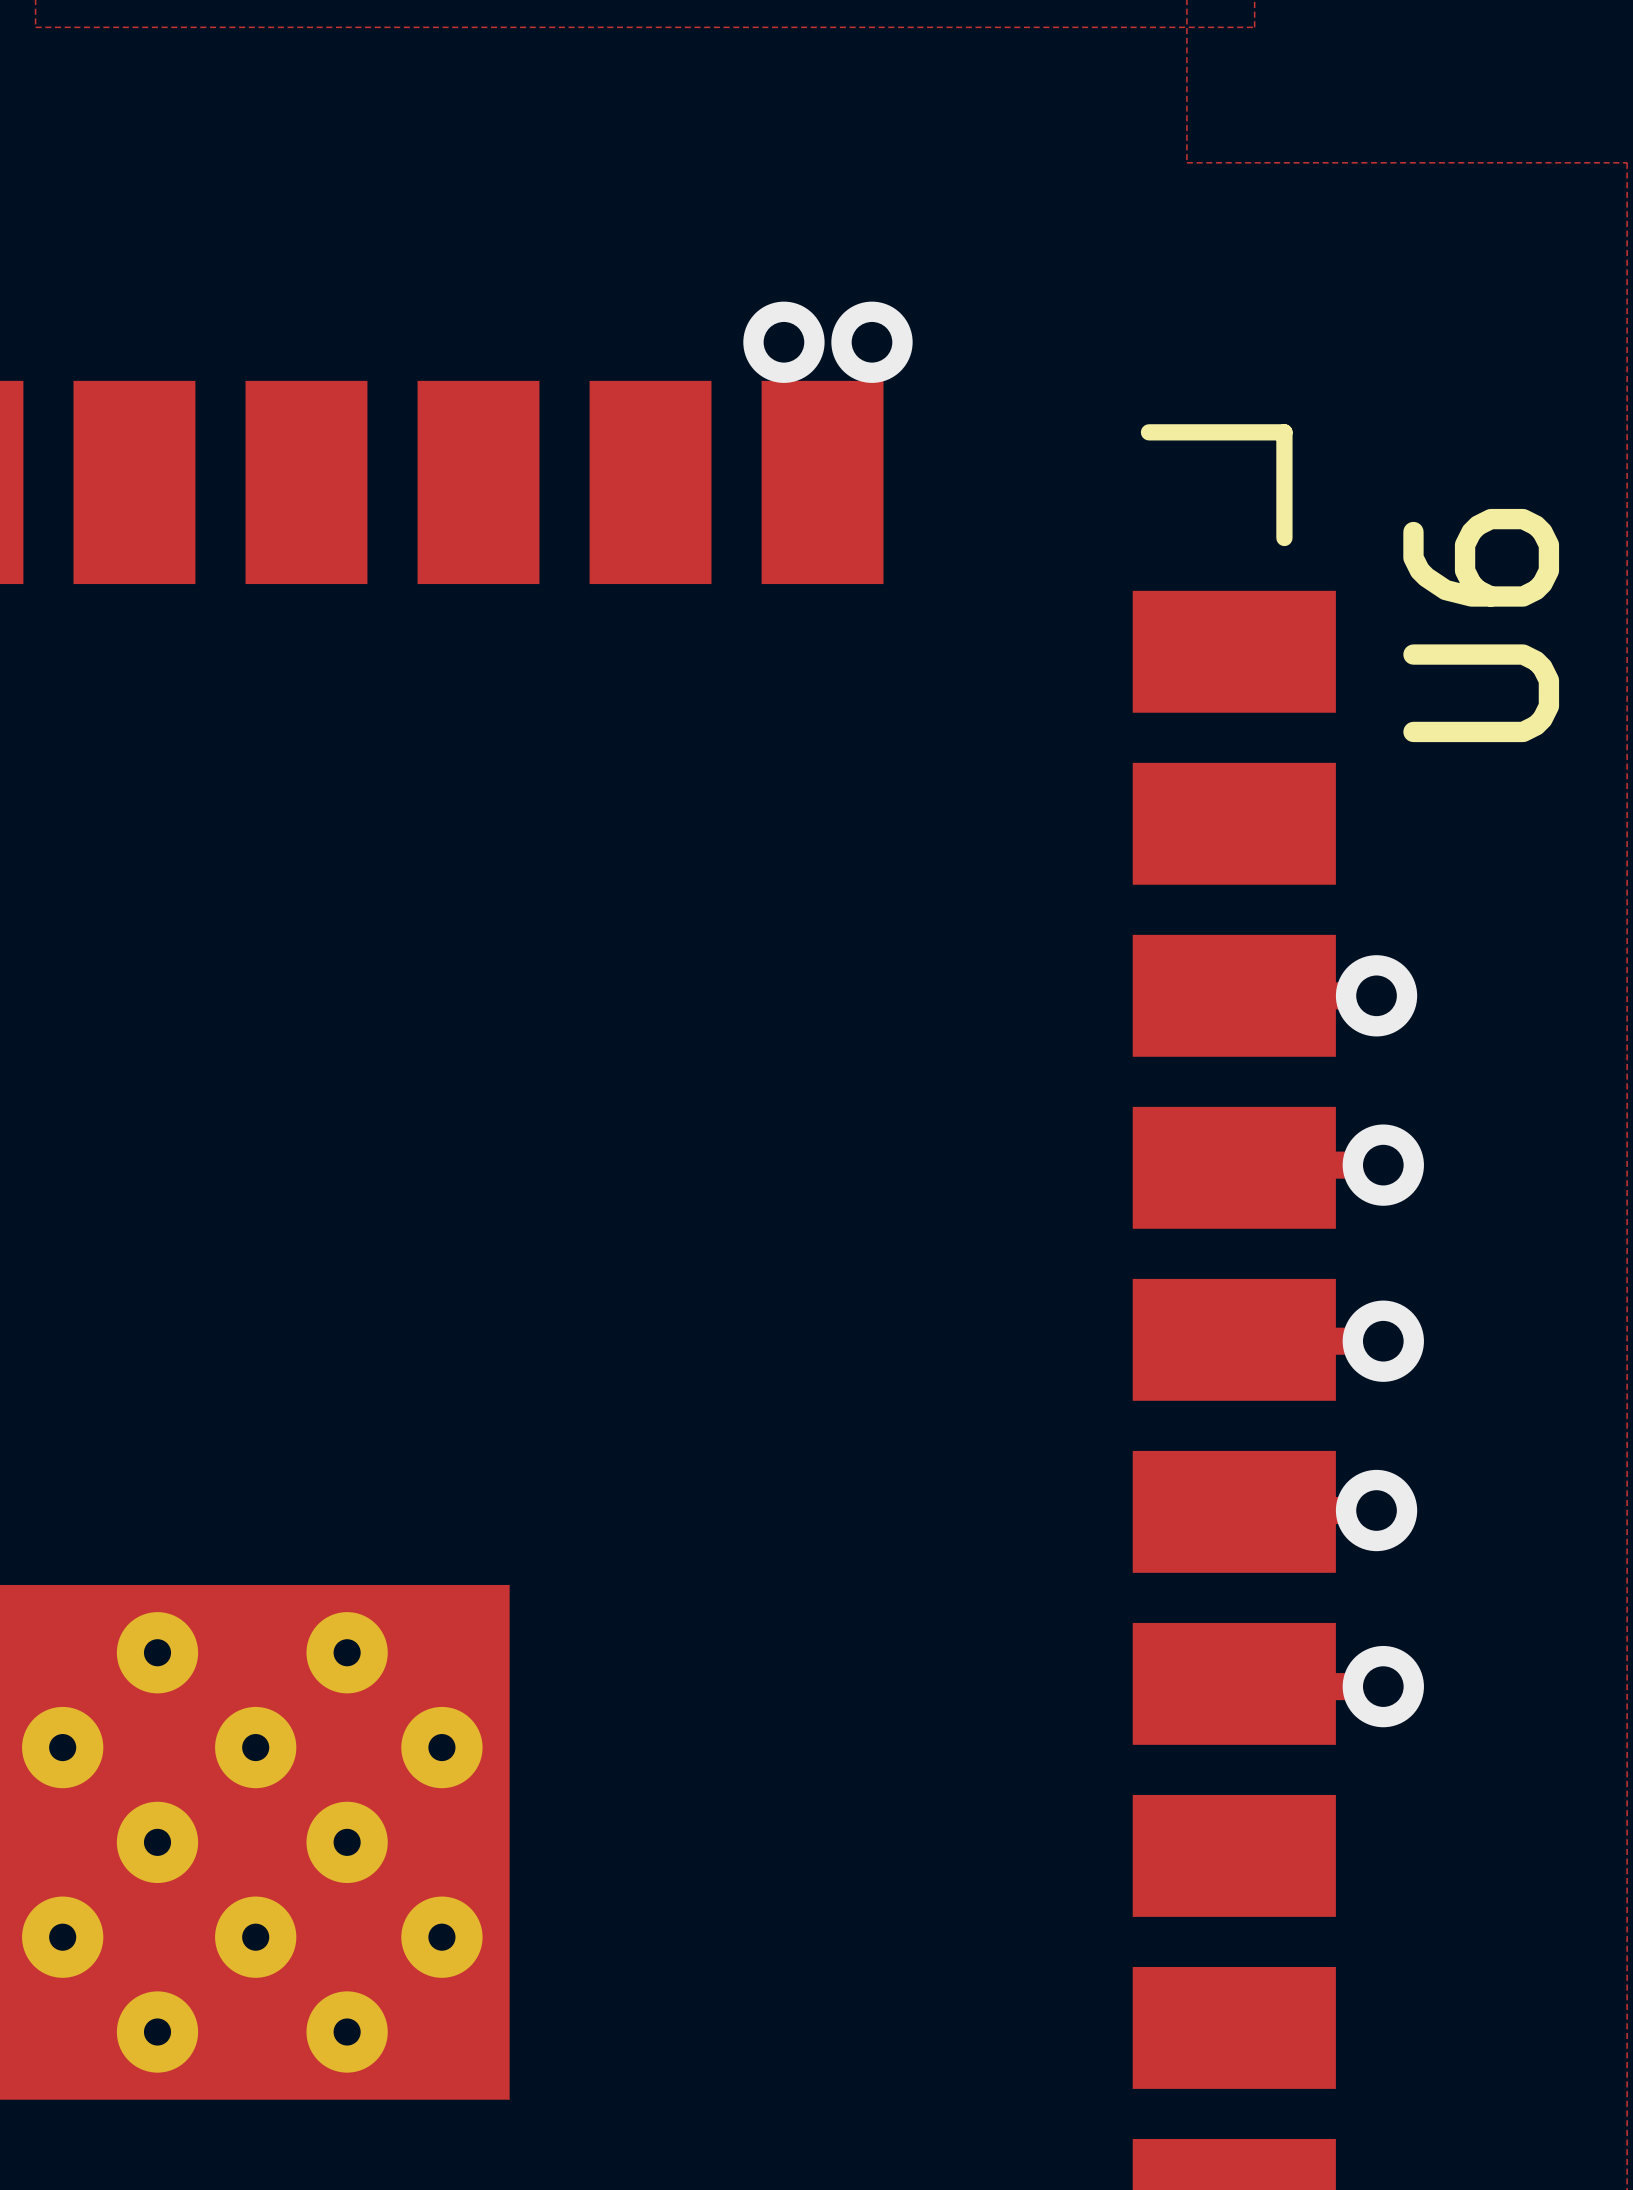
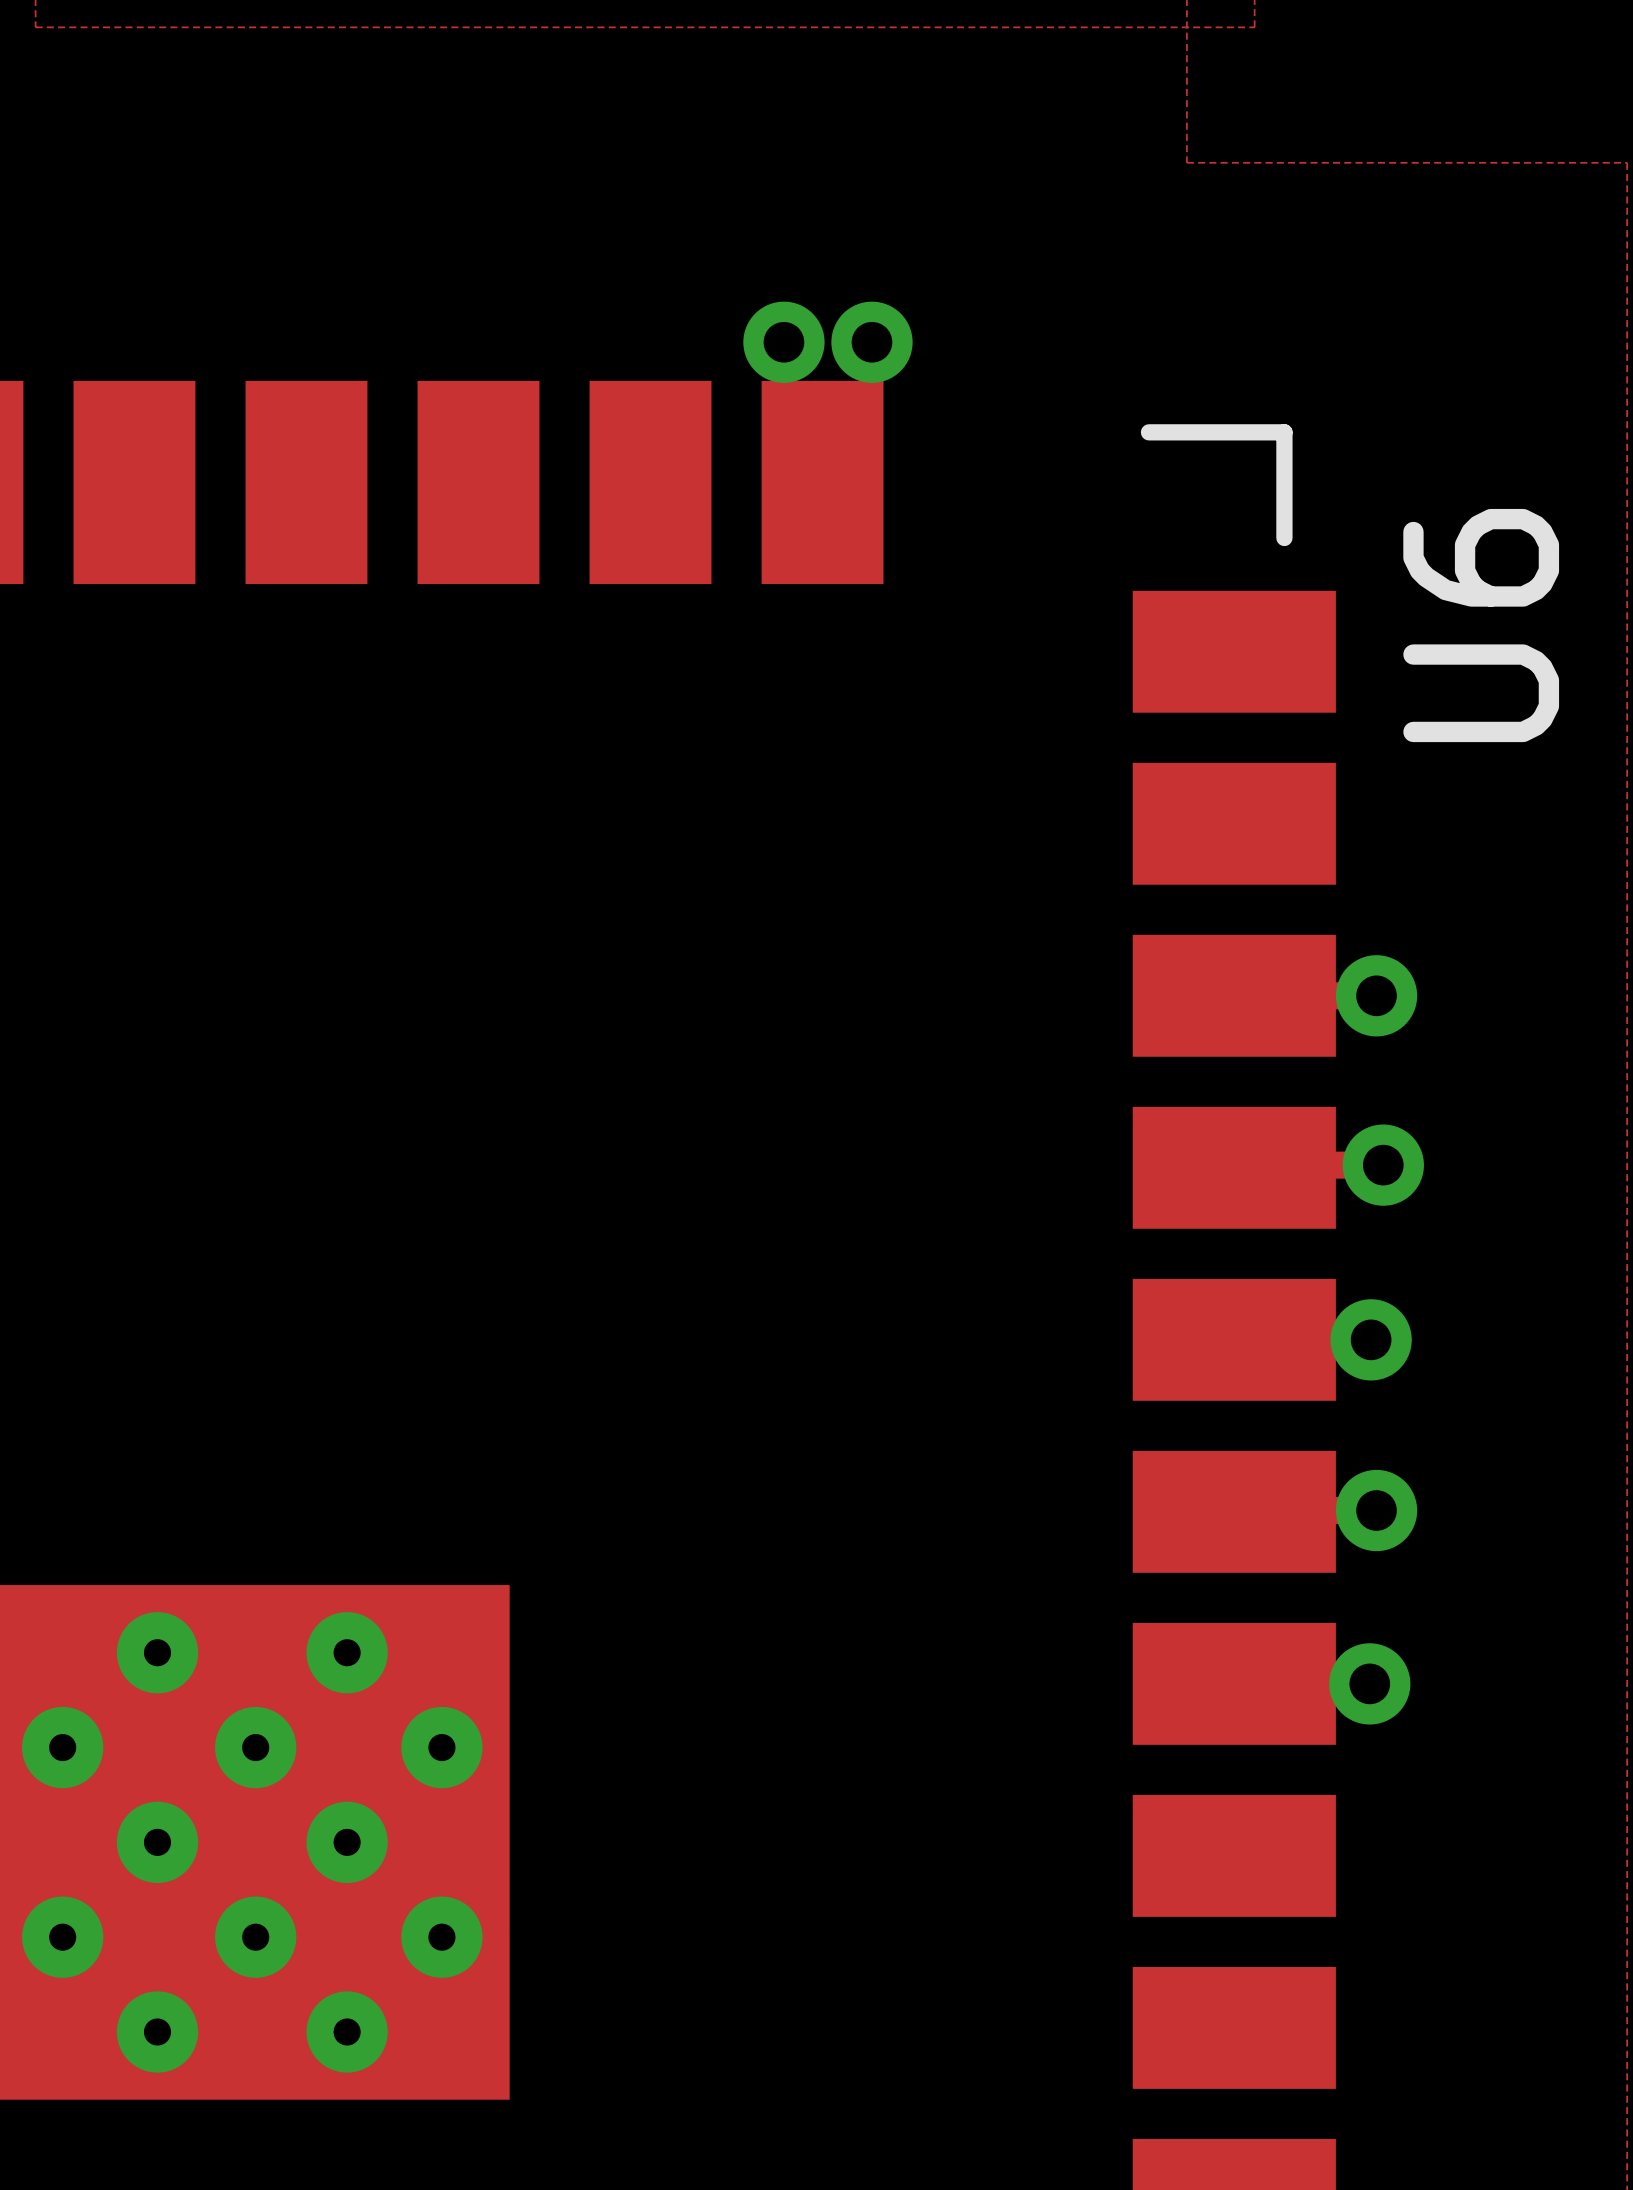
via position: (1383, 1341) -> (1371, 1339)
via position: (1383, 1686) -> (1369, 1683)

